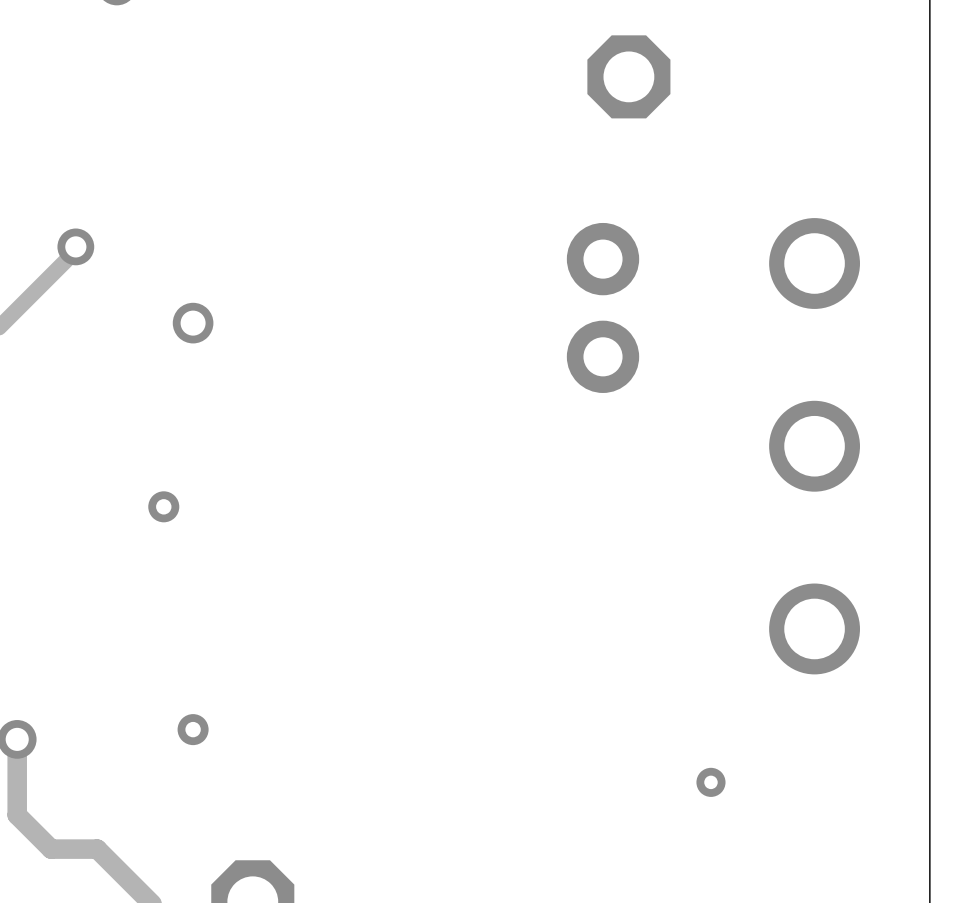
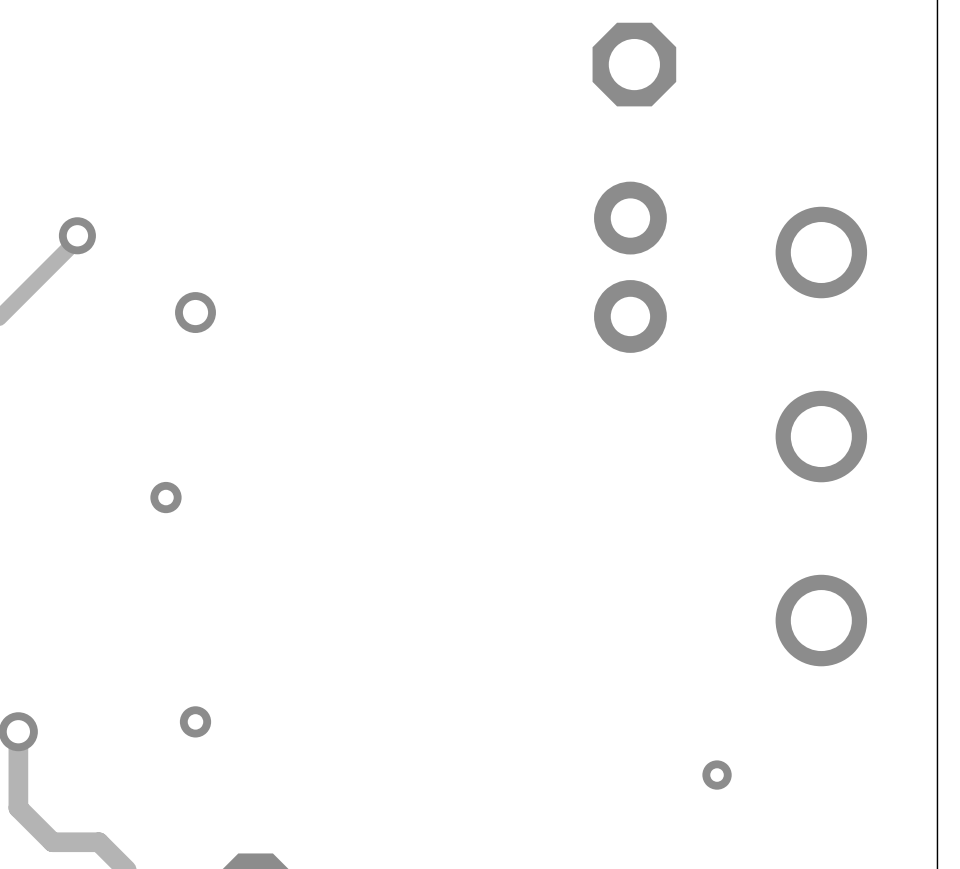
part position: (603, 307) -> (630, 267)

